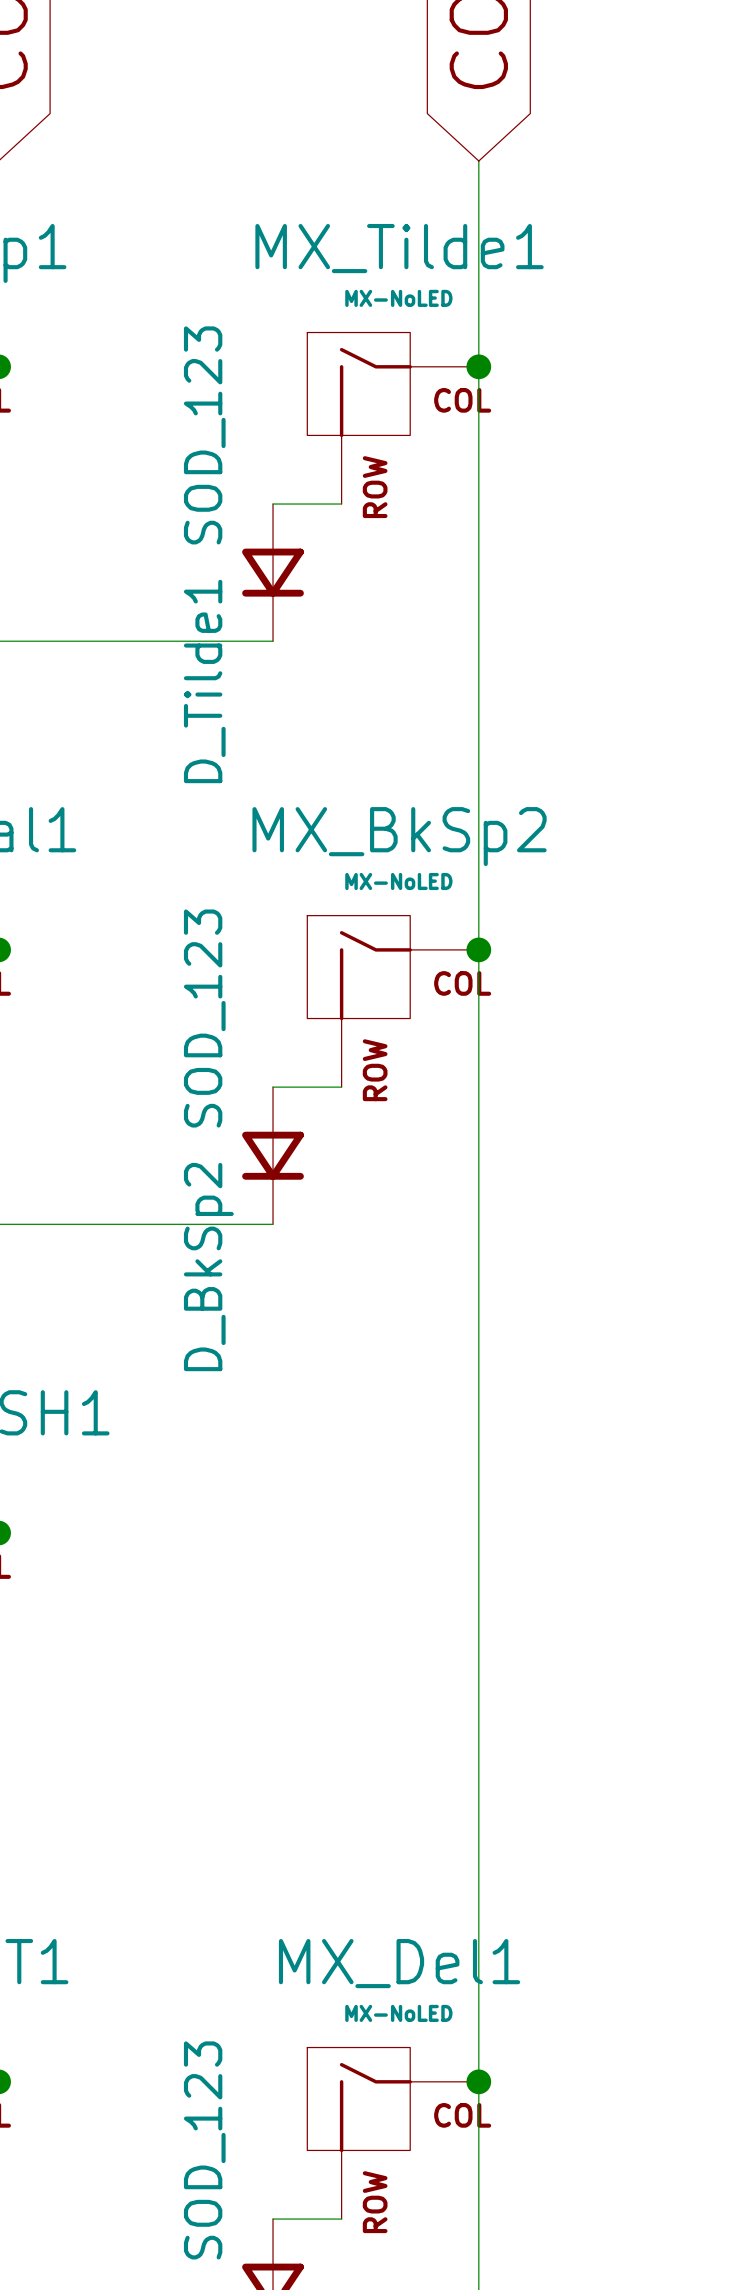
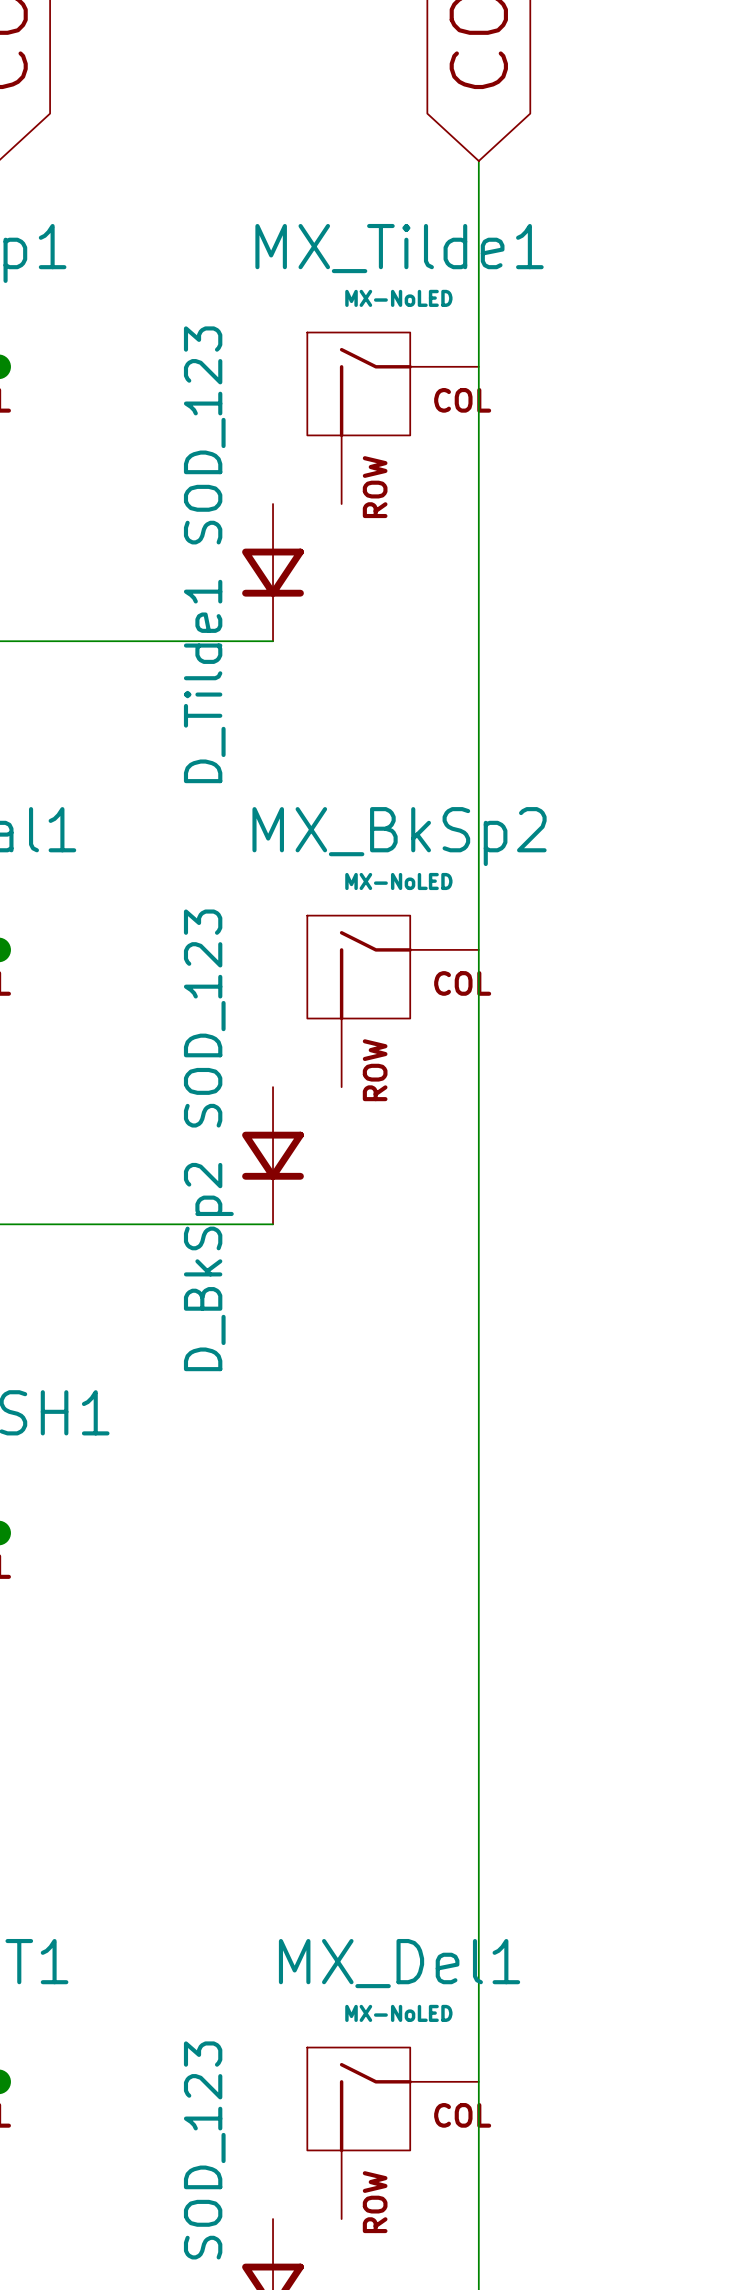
junction: (478, 366) -> none
wire: (273, 504) (341, 504) -> none
junction: (478, 949) -> none
wire: (273, 1087) (341, 1087) -> none
junction: (478, 2081) -> none
wire: (273, 2219) (341, 2219) -> none

